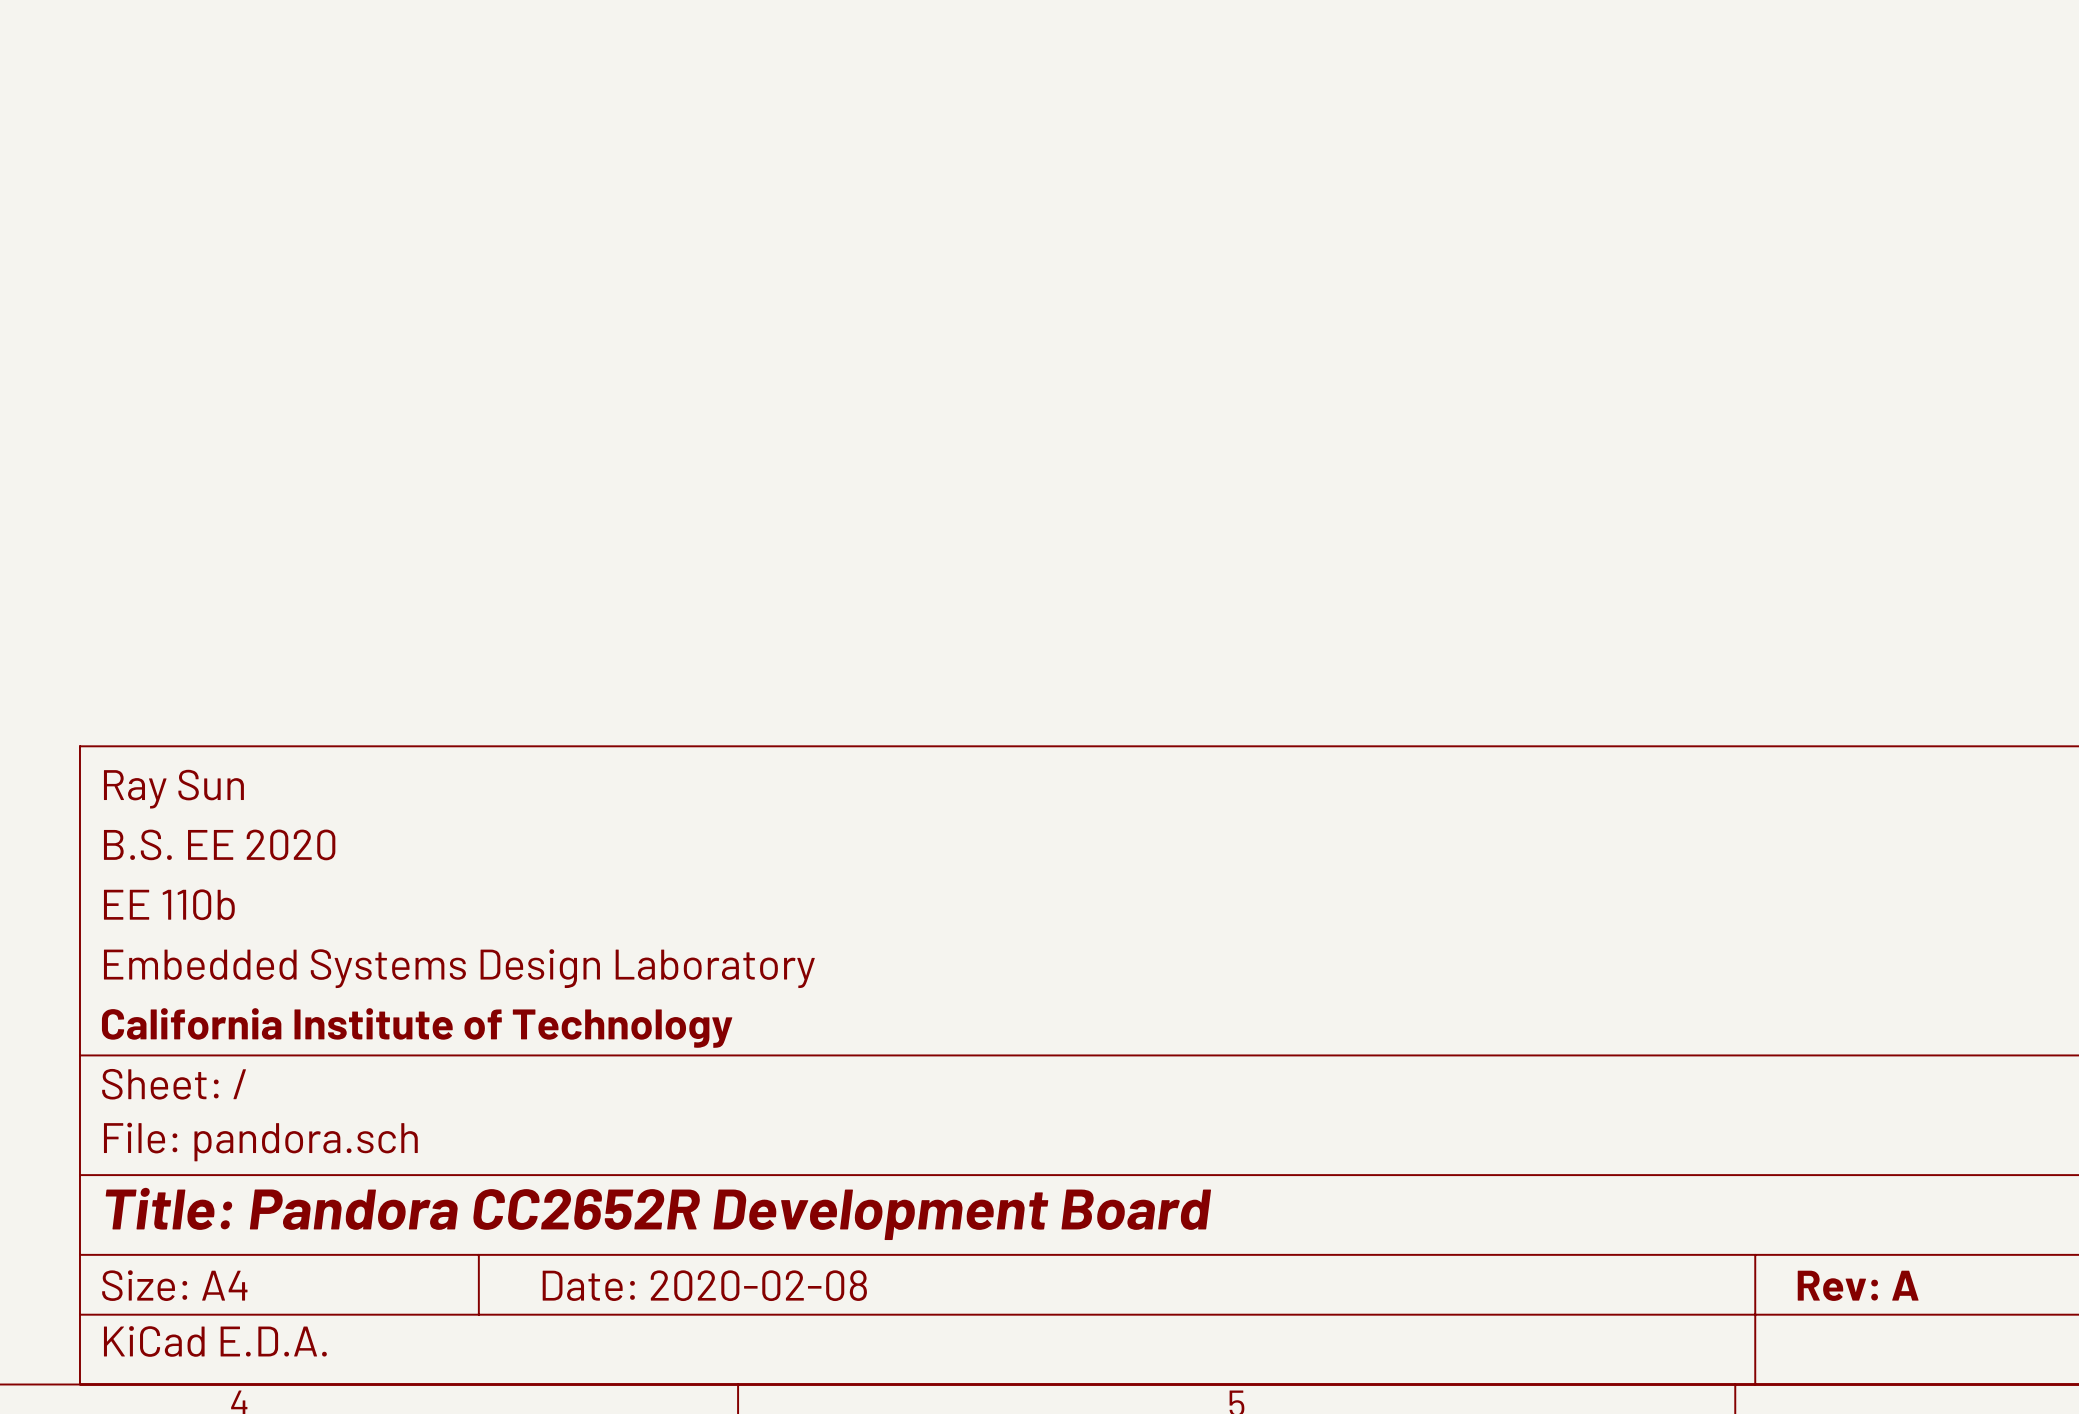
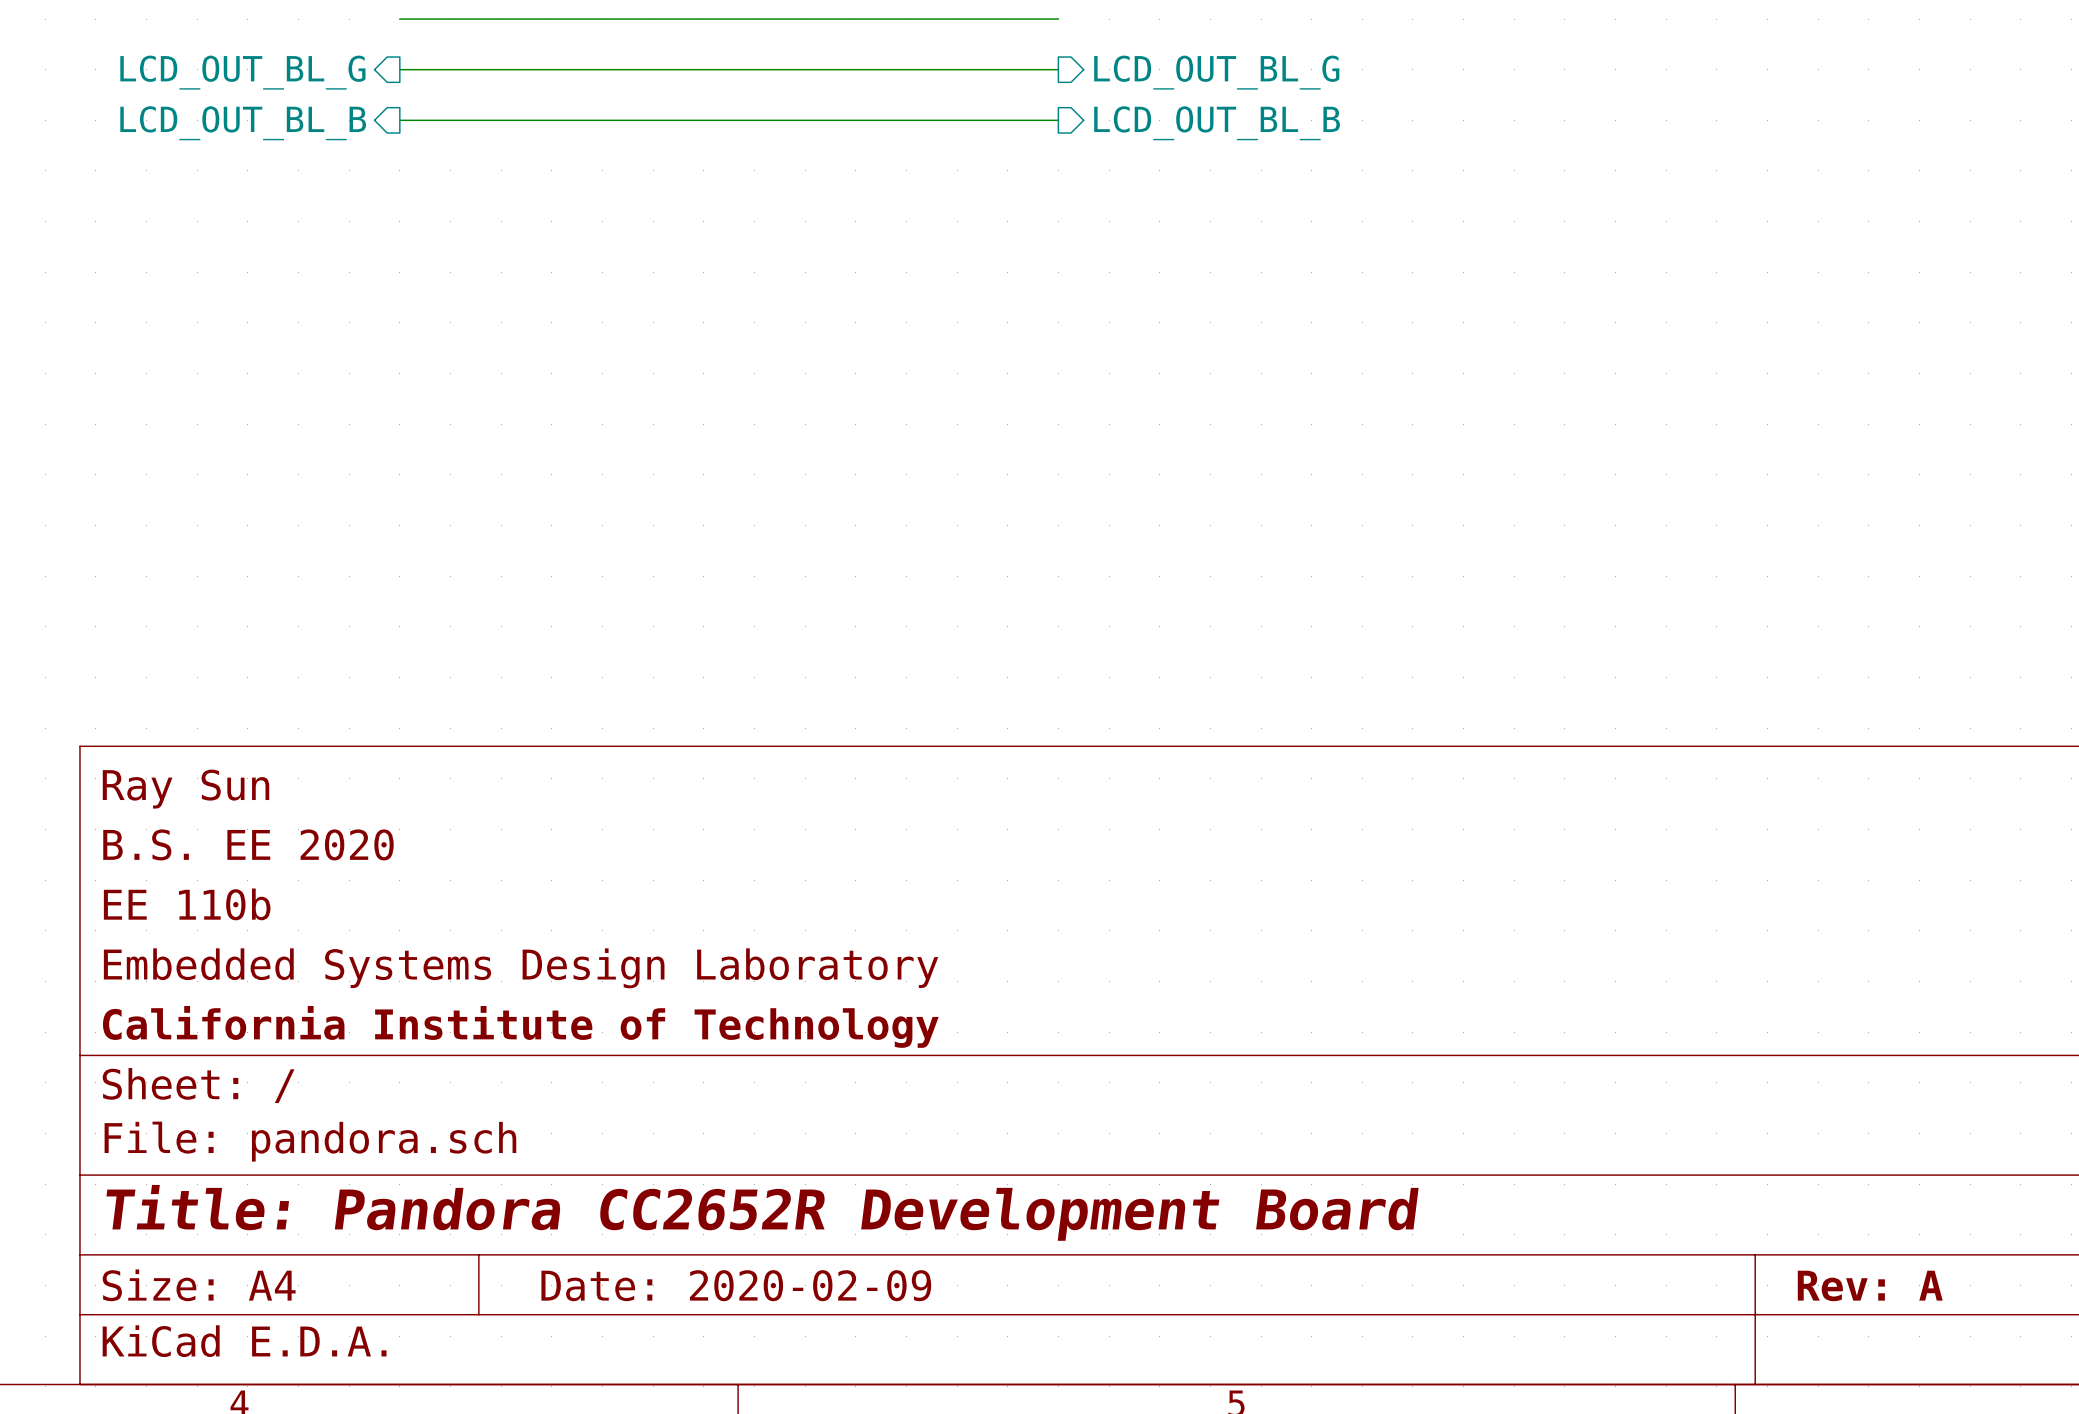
wire: none -> (399, 19) (1058, 19)
sheet pin: none -> LCD_OUT_BL_G (242, 72)
sheet pin: none -> LCD_OUT_BL_G (1216, 72)
wire: none -> (399, 69) (1058, 69)
sheet pin: none -> LCD_OUT_BL_B (243, 123)
sheet pin: none -> LCD_OUT_BL_B (1217, 123)
wire: none -> (399, 120) (1058, 120)
title block: Date: 2020-02-08 (704, 1285) -> Date: 2020-02-09 (736, 1285)

